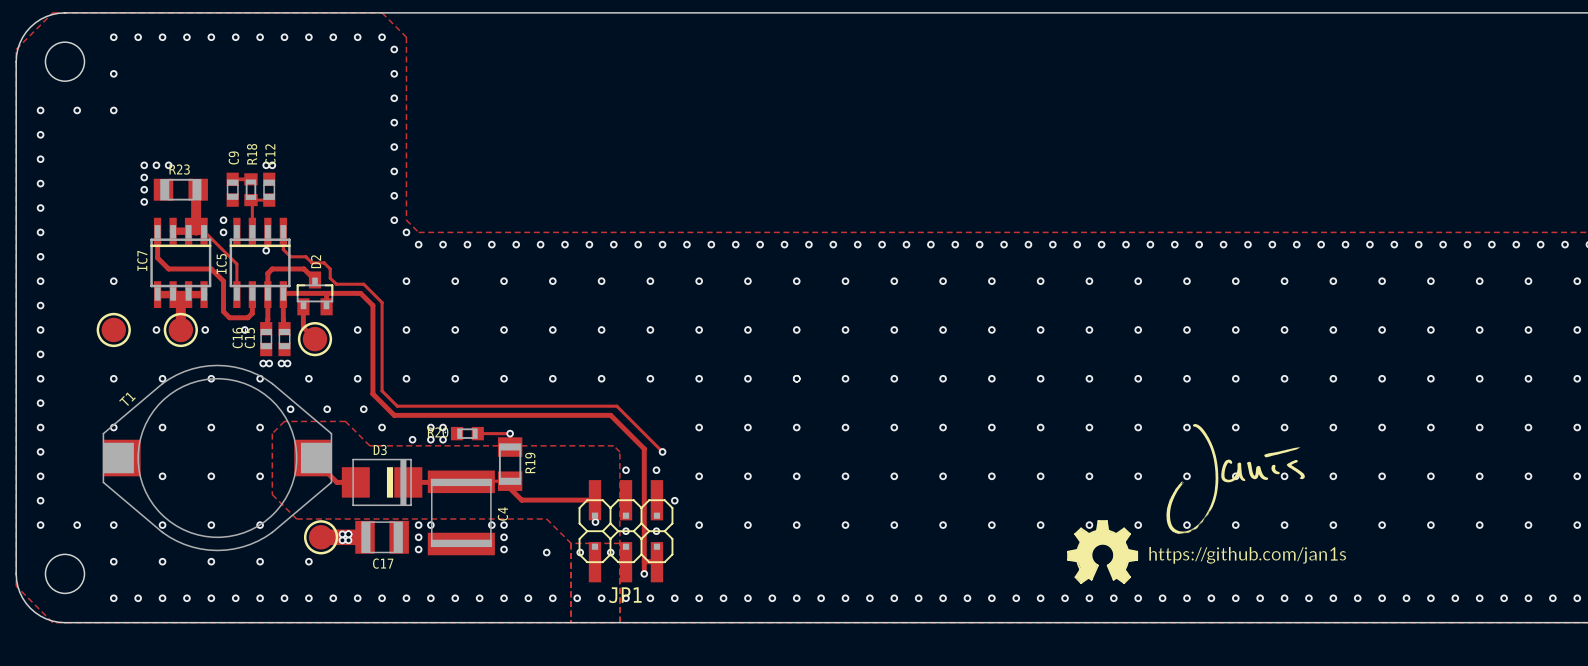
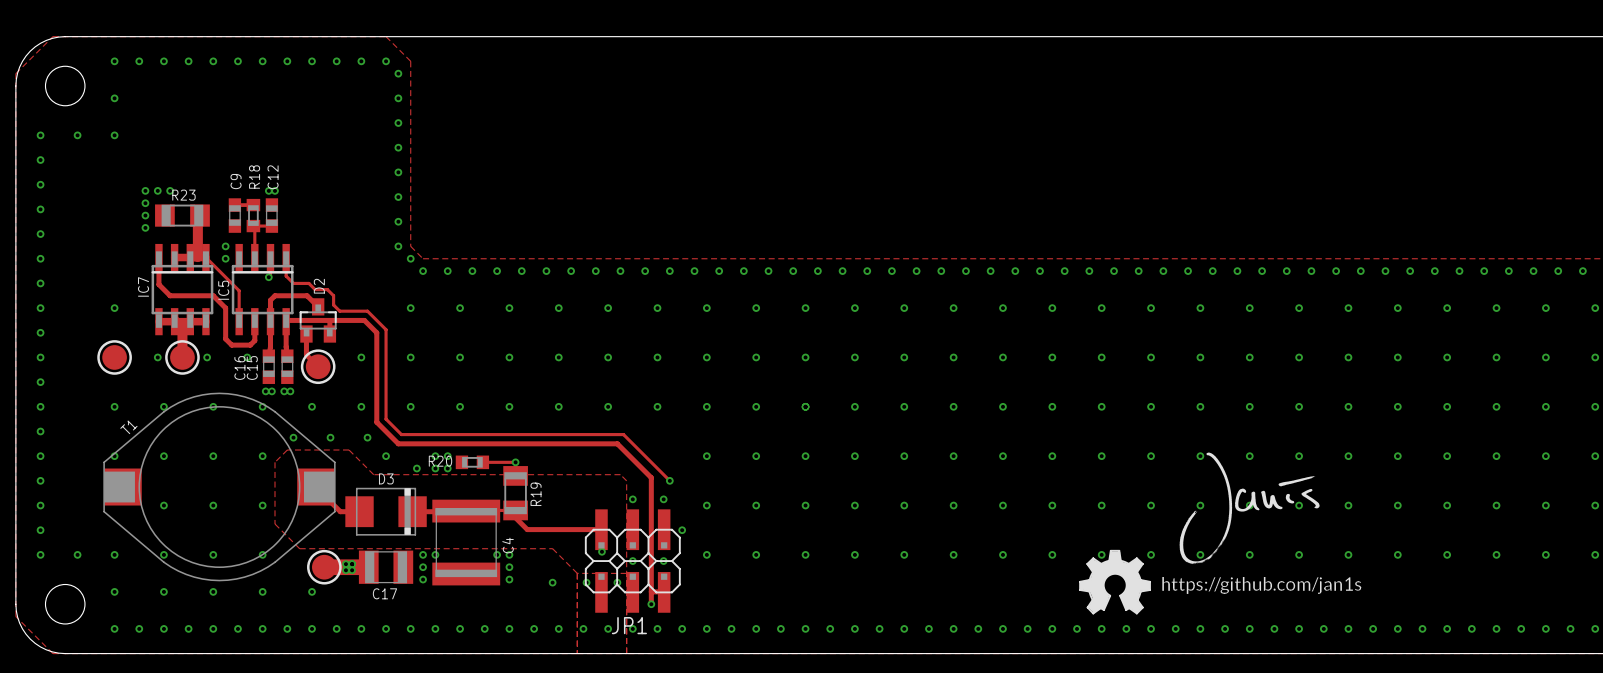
D3 footprint: [341, 458, 423, 507] -> [345, 487, 427, 536]

